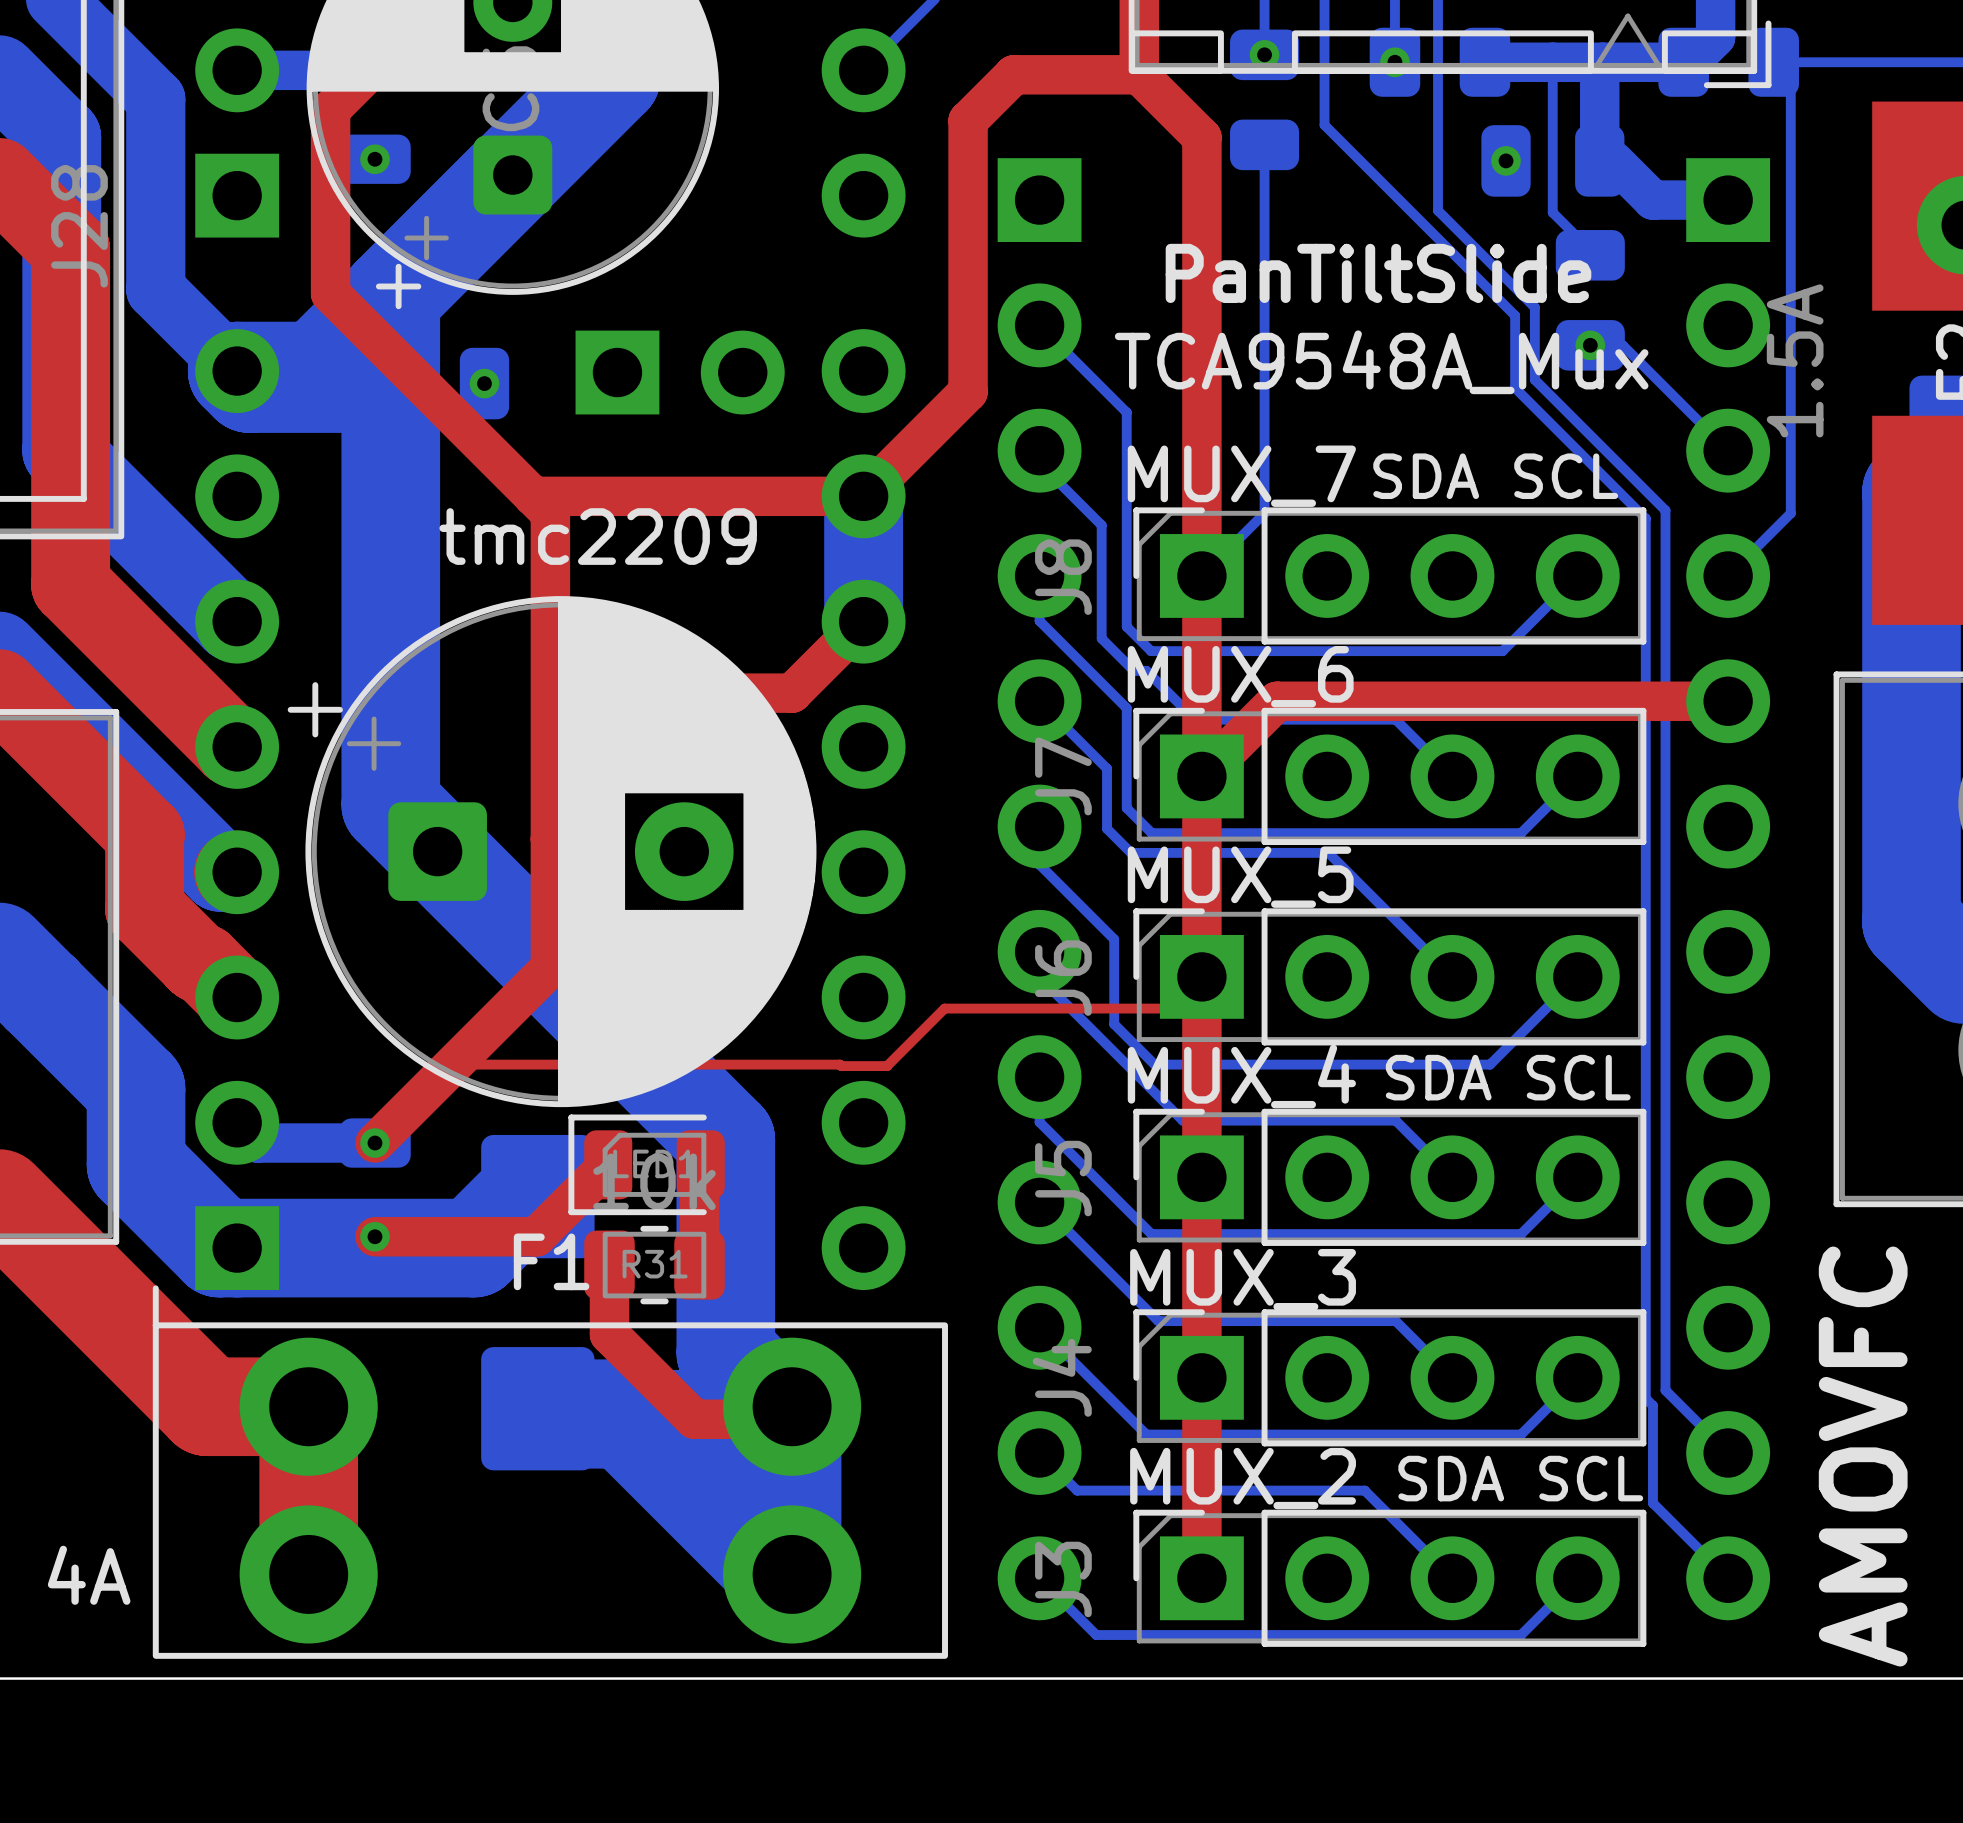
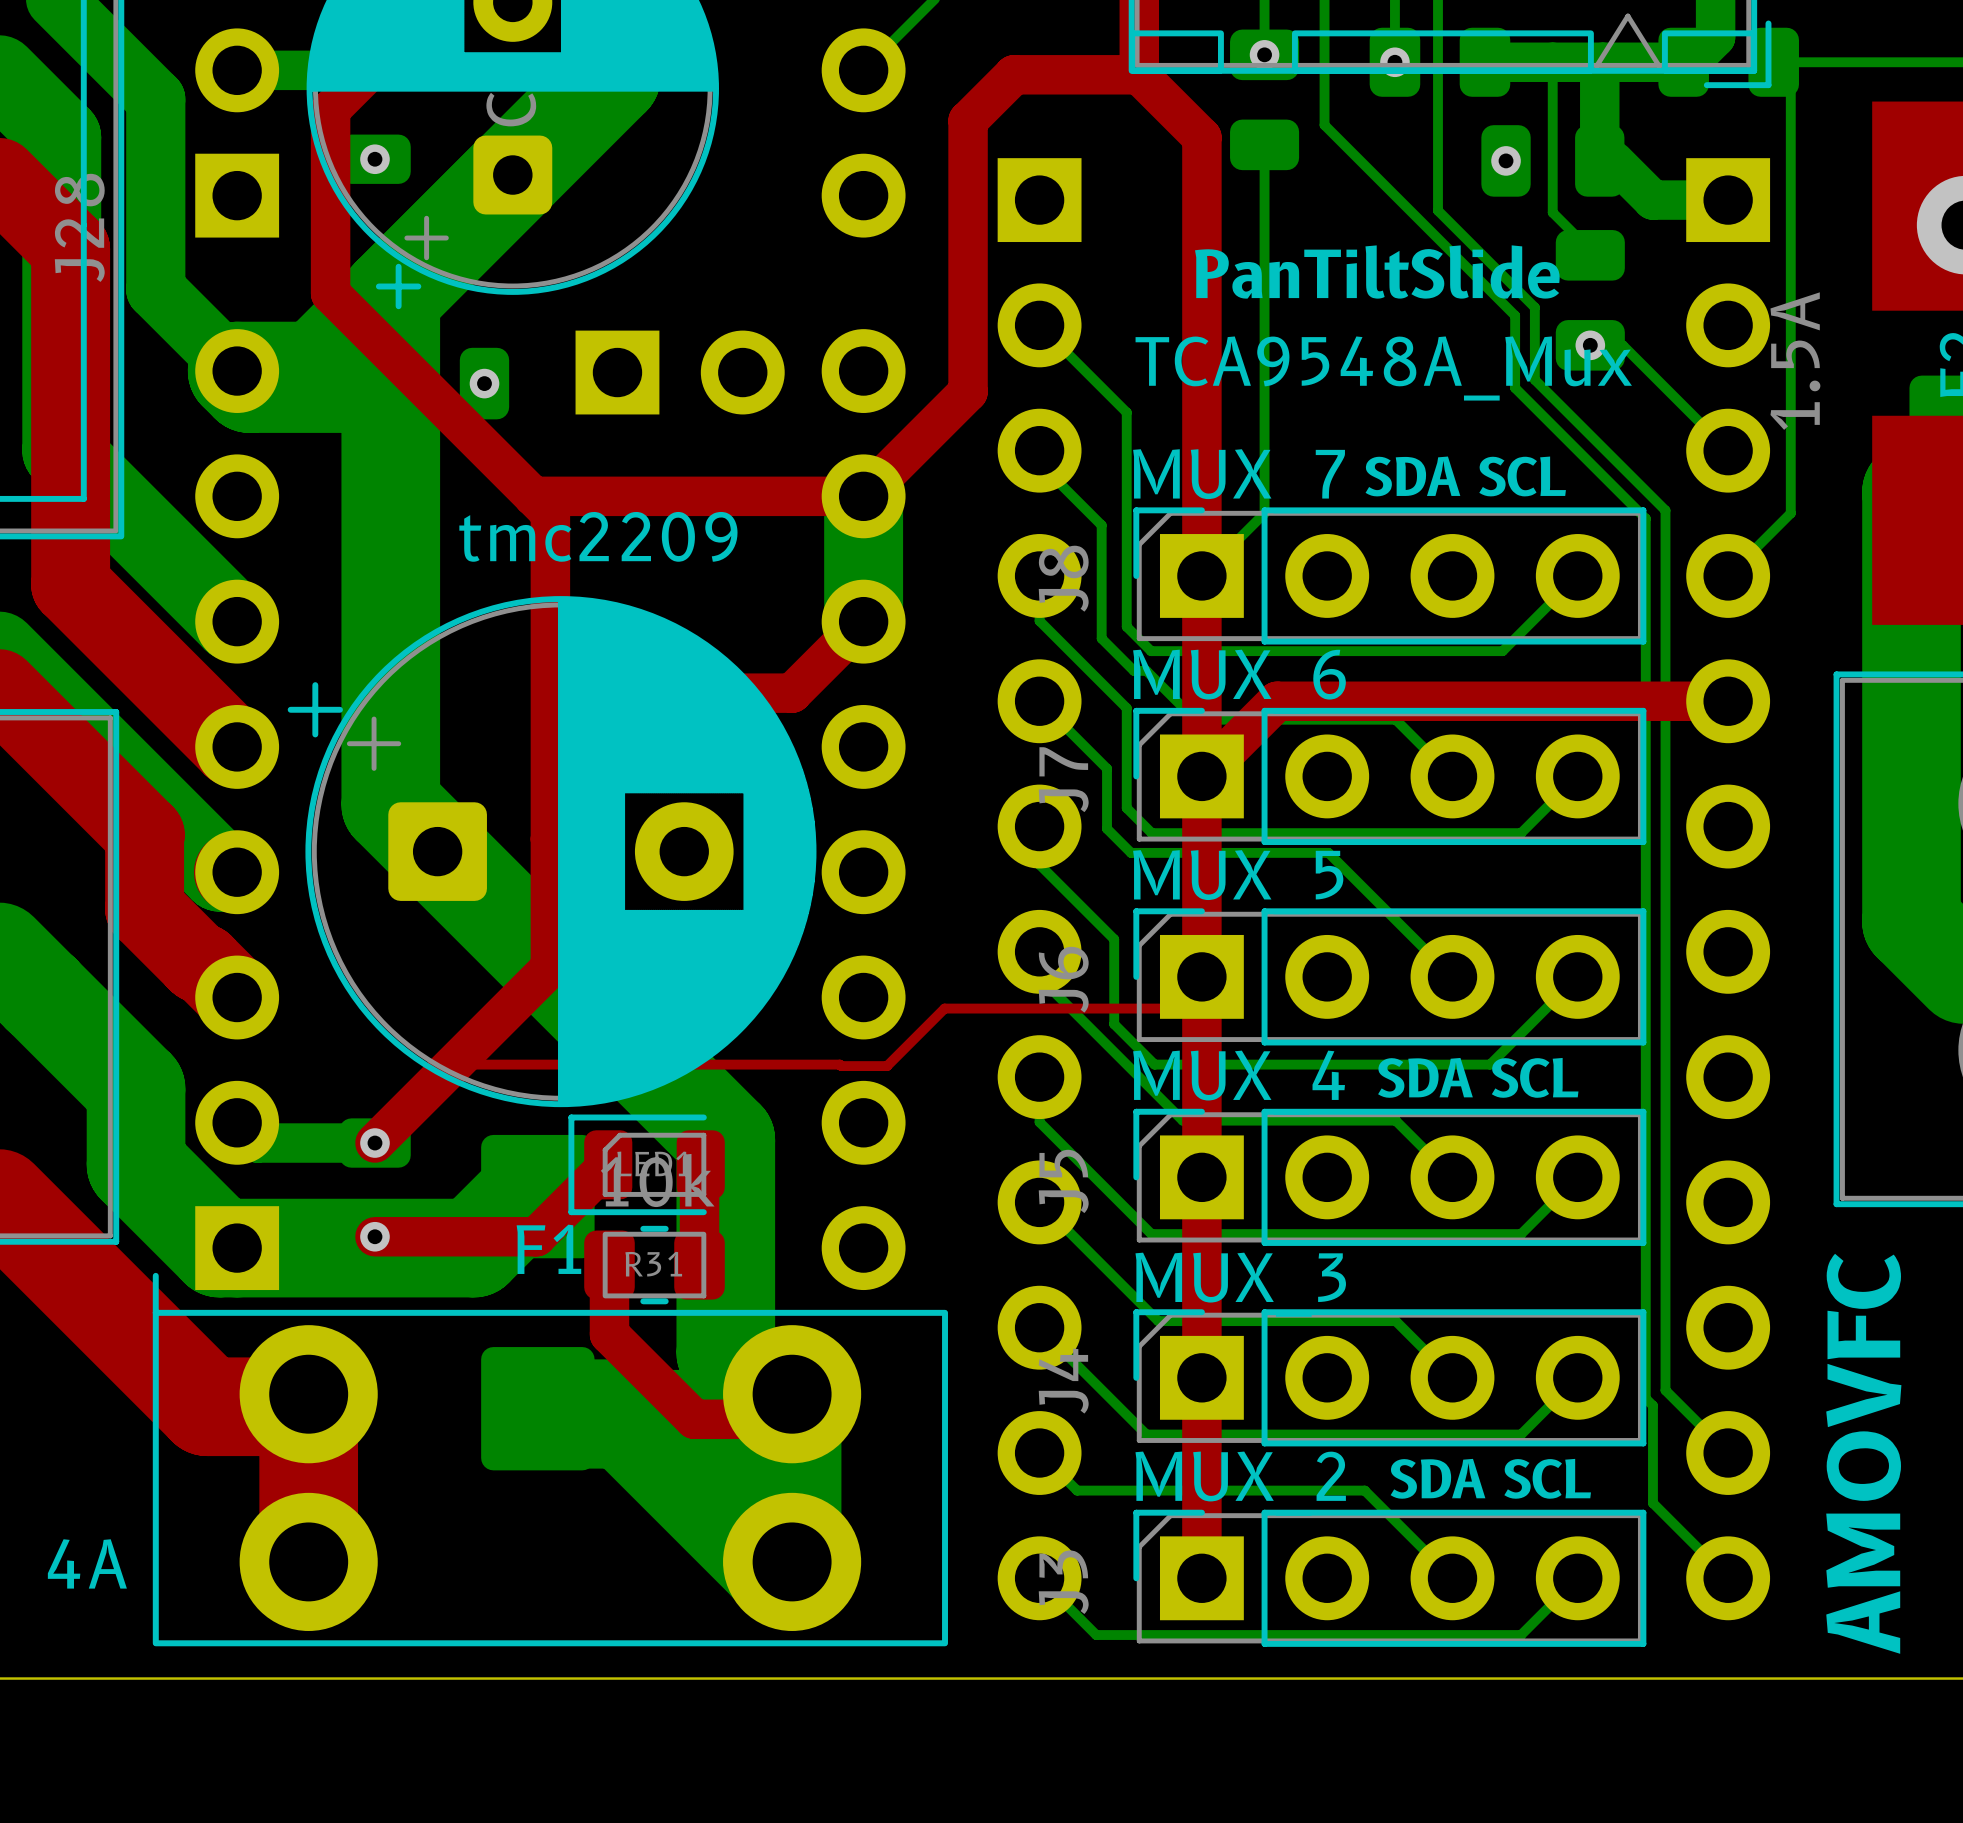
F1 position: (550, 1472) -> (550, 1459)

